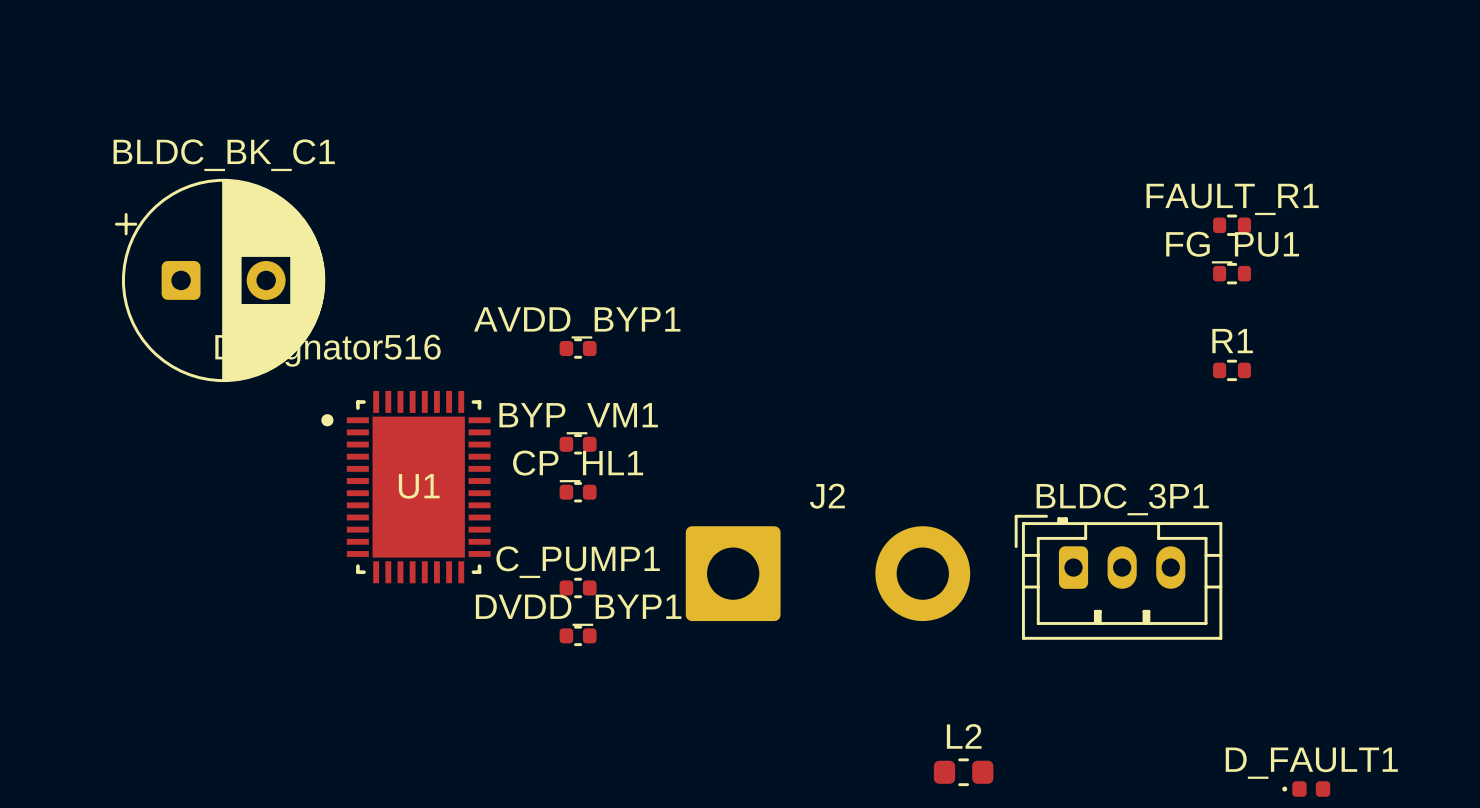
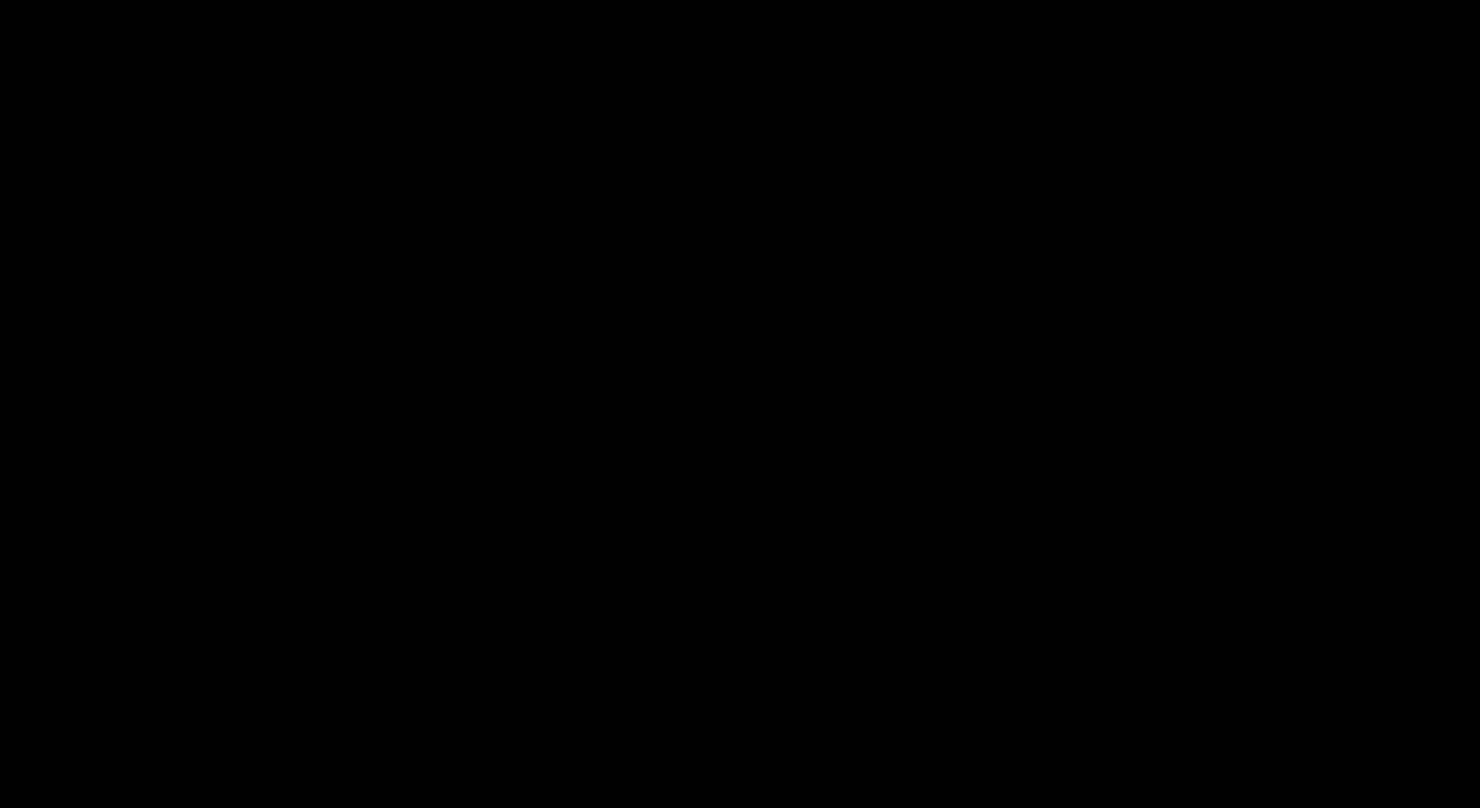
FAULT_R1: (1232, 225) -> none
FG_PU1: (1232, 273) -> none
BLDC_BK_C1: (220, 280) -> none
AVDD_BYP1: (578, 348) -> none
R1: (1232, 370) -> none
BYP_VM1: (578, 444) -> none
U1: (405, 487) -> none
CP_HL1: (578, 492) -> none
J2: (827, 573) -> none
BLDC_3P1: (1118, 577) -> none
C_PUMP1: (578, 587) -> none
DVDD_BYP1: (578, 635) -> none
L2: (963, 772) -> none
D_FAULT1: (1306, 789) -> none

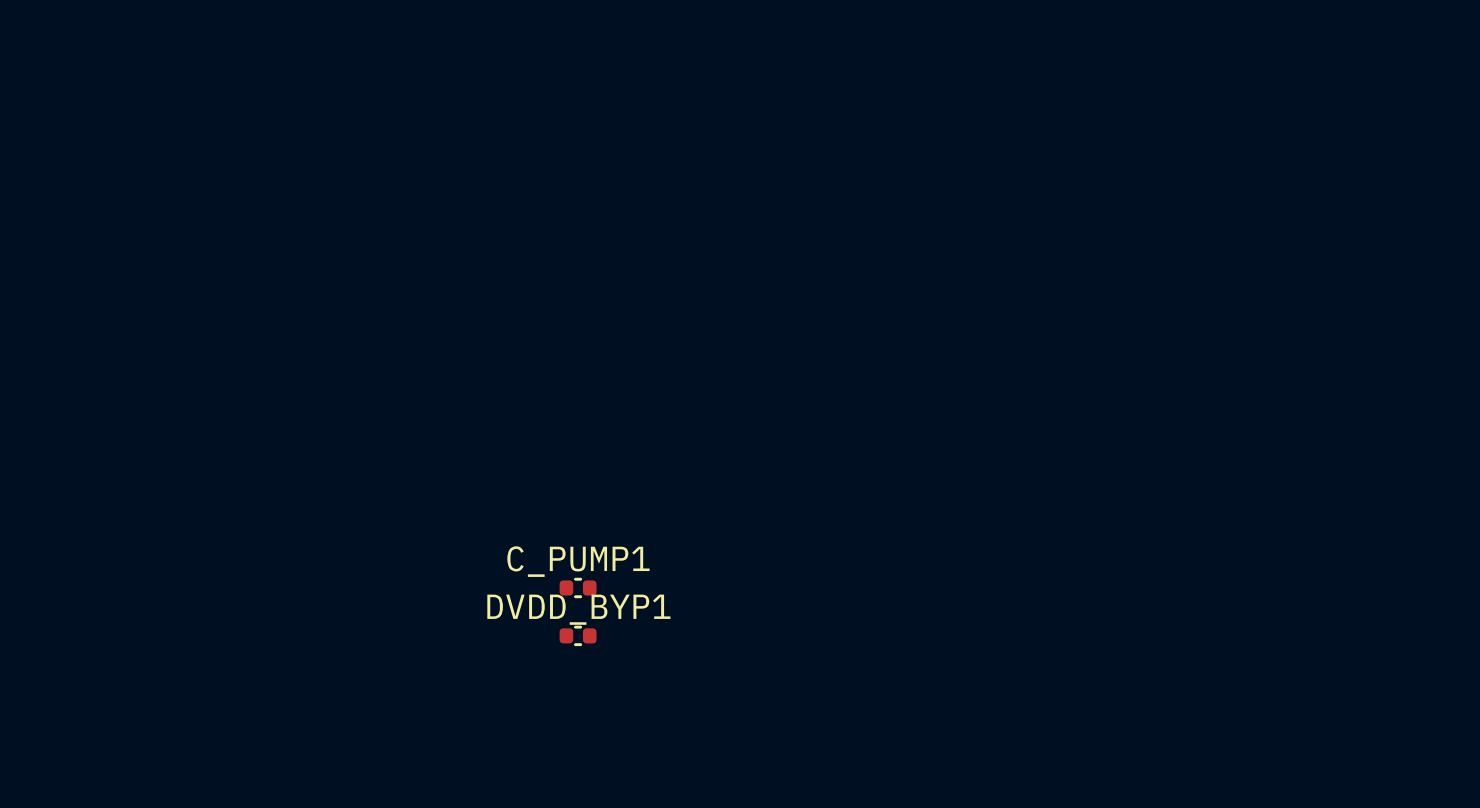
C_PUMP1: none -> (578, 587)
DVDD_BYP1: none -> (578, 635)

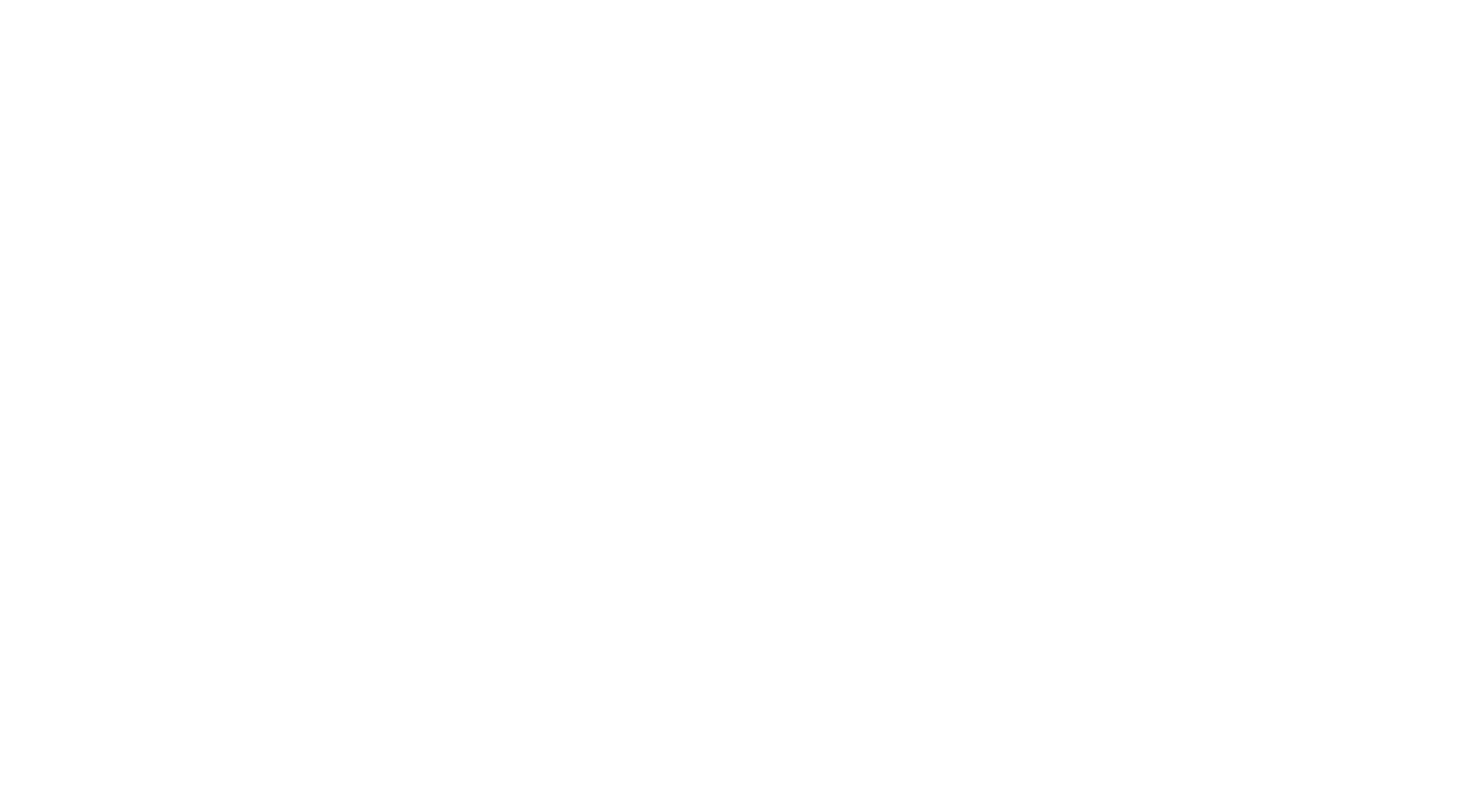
C_PUMP1: (578, 587) -> none
DVDD_BYP1: (578, 635) -> none

